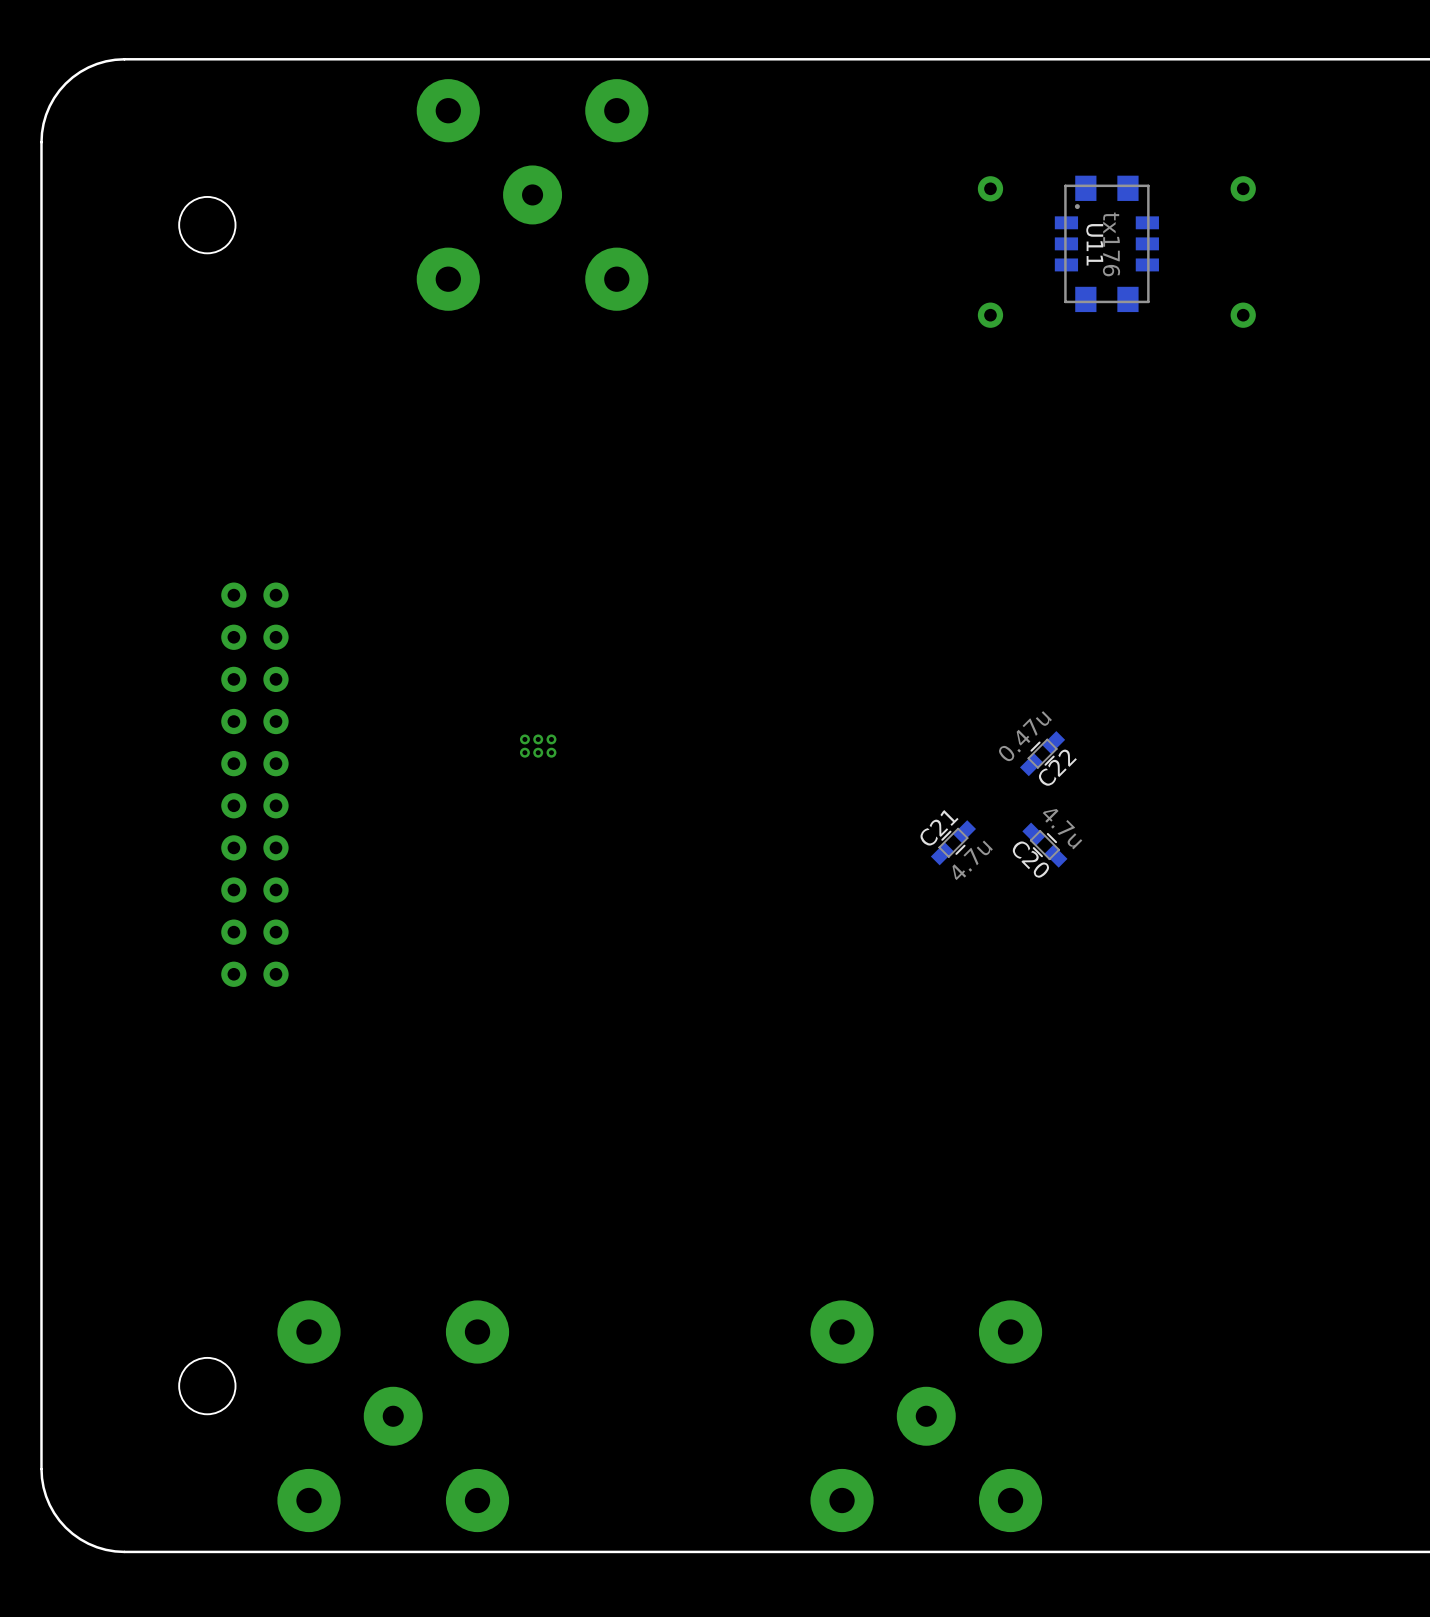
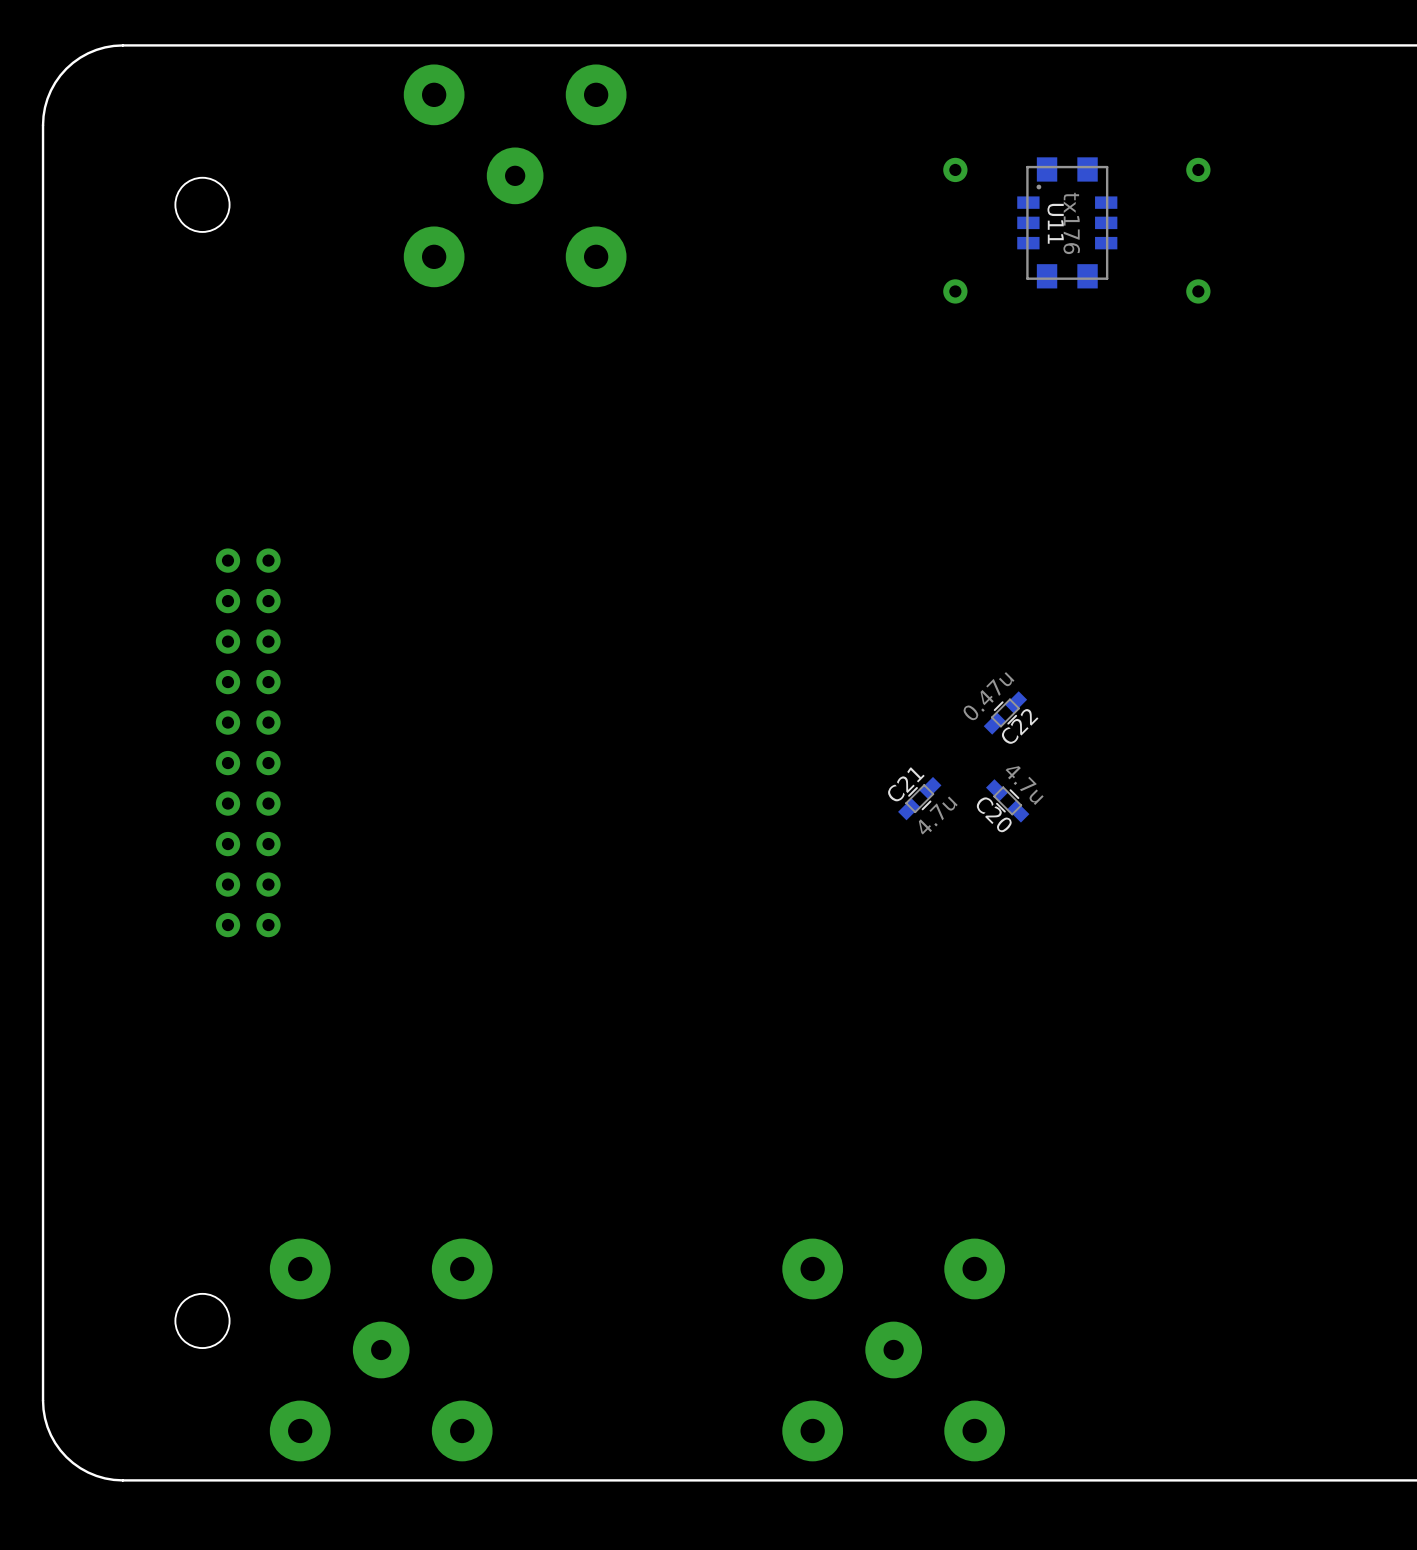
part: (524, 739) -> none
part: (538, 739) -> none
part: (551, 739) -> none
part: (524, 752) -> none
part: (538, 752) -> none
part: (551, 752) -> none

